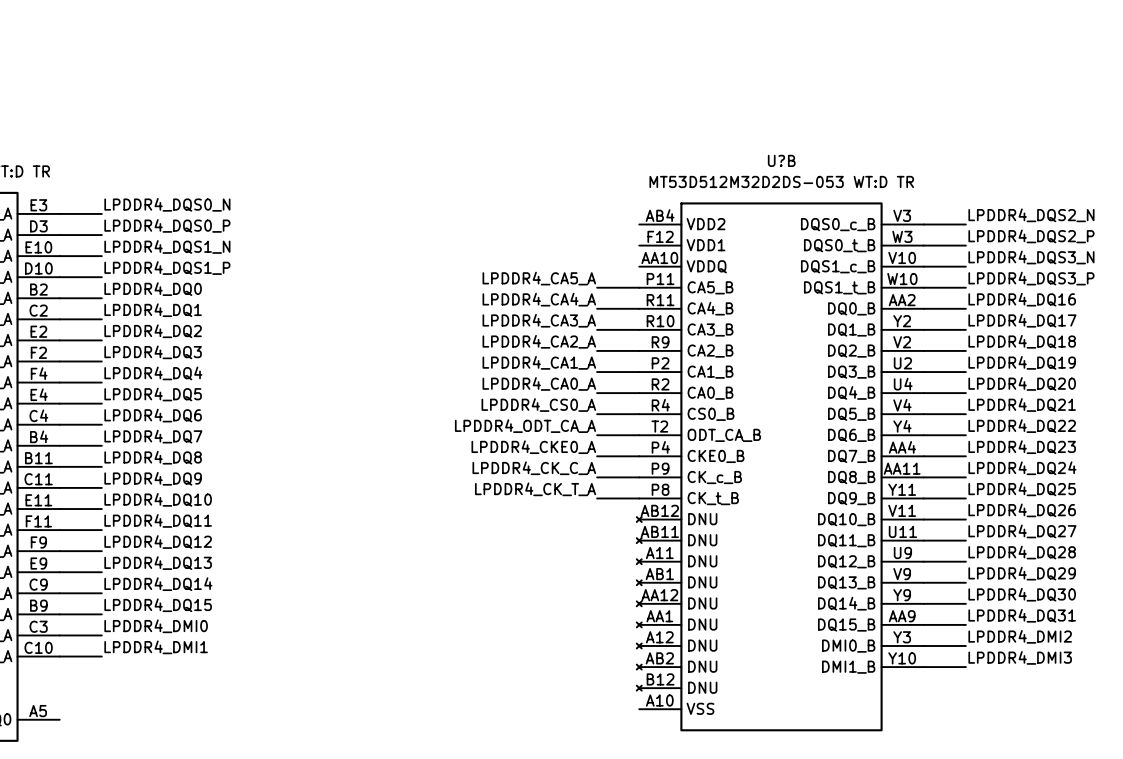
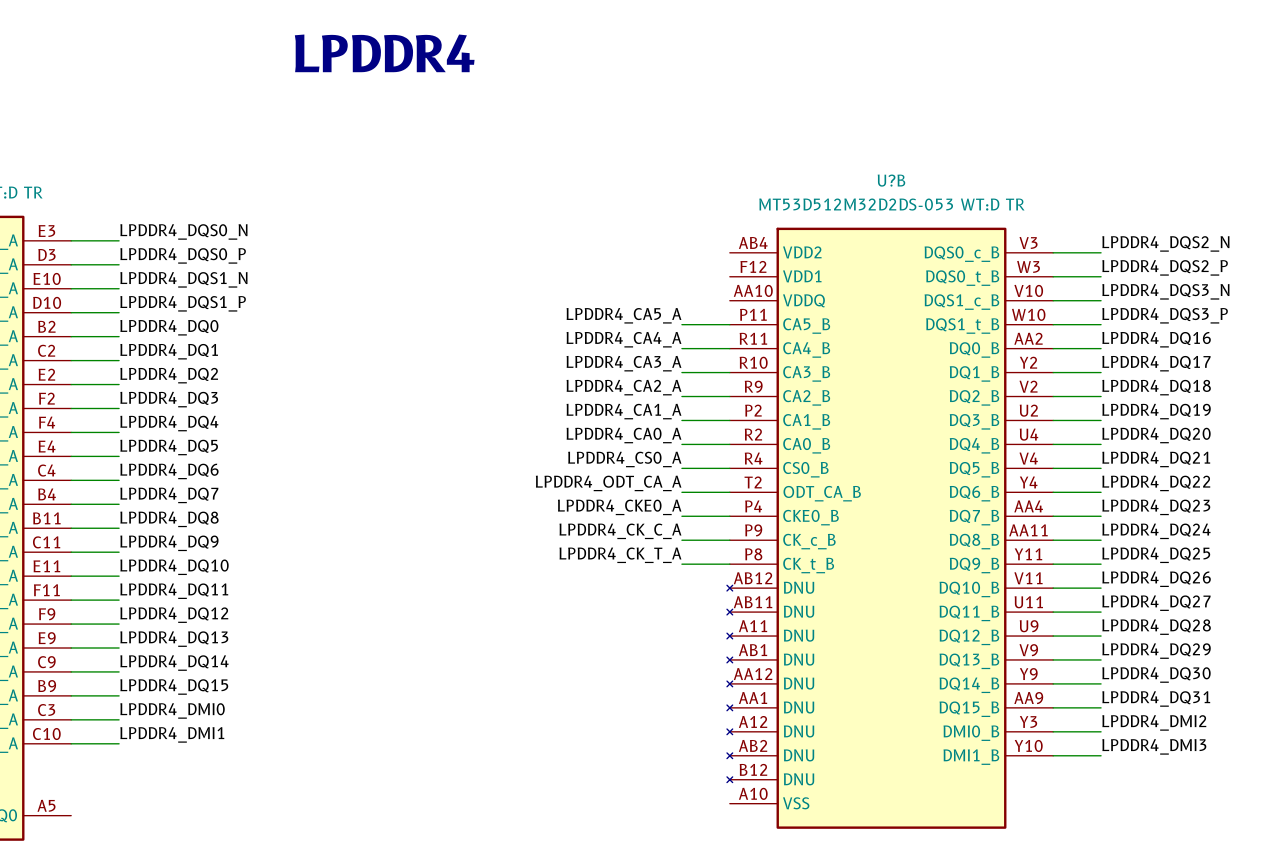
text: none -> LPDDR4 (384, 53)

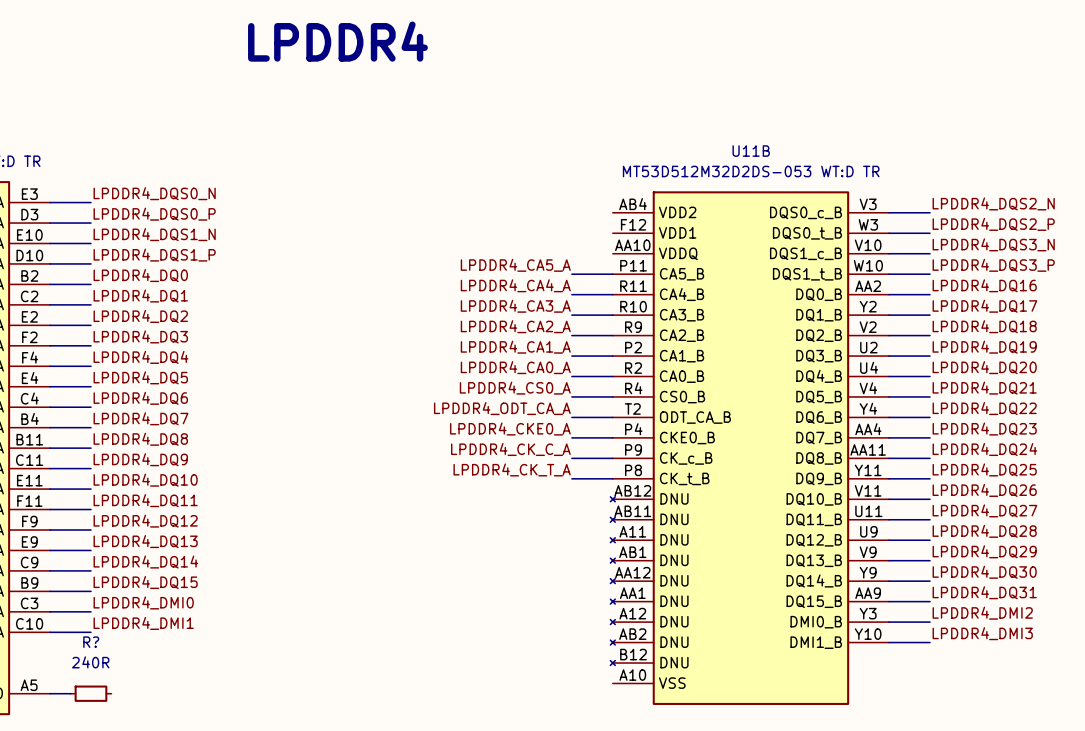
U?B name: U?B (891, 180) -> U11B (751, 151)
wire: none -> (50, 693) (70, 693)
R?: none -> (90, 693)

